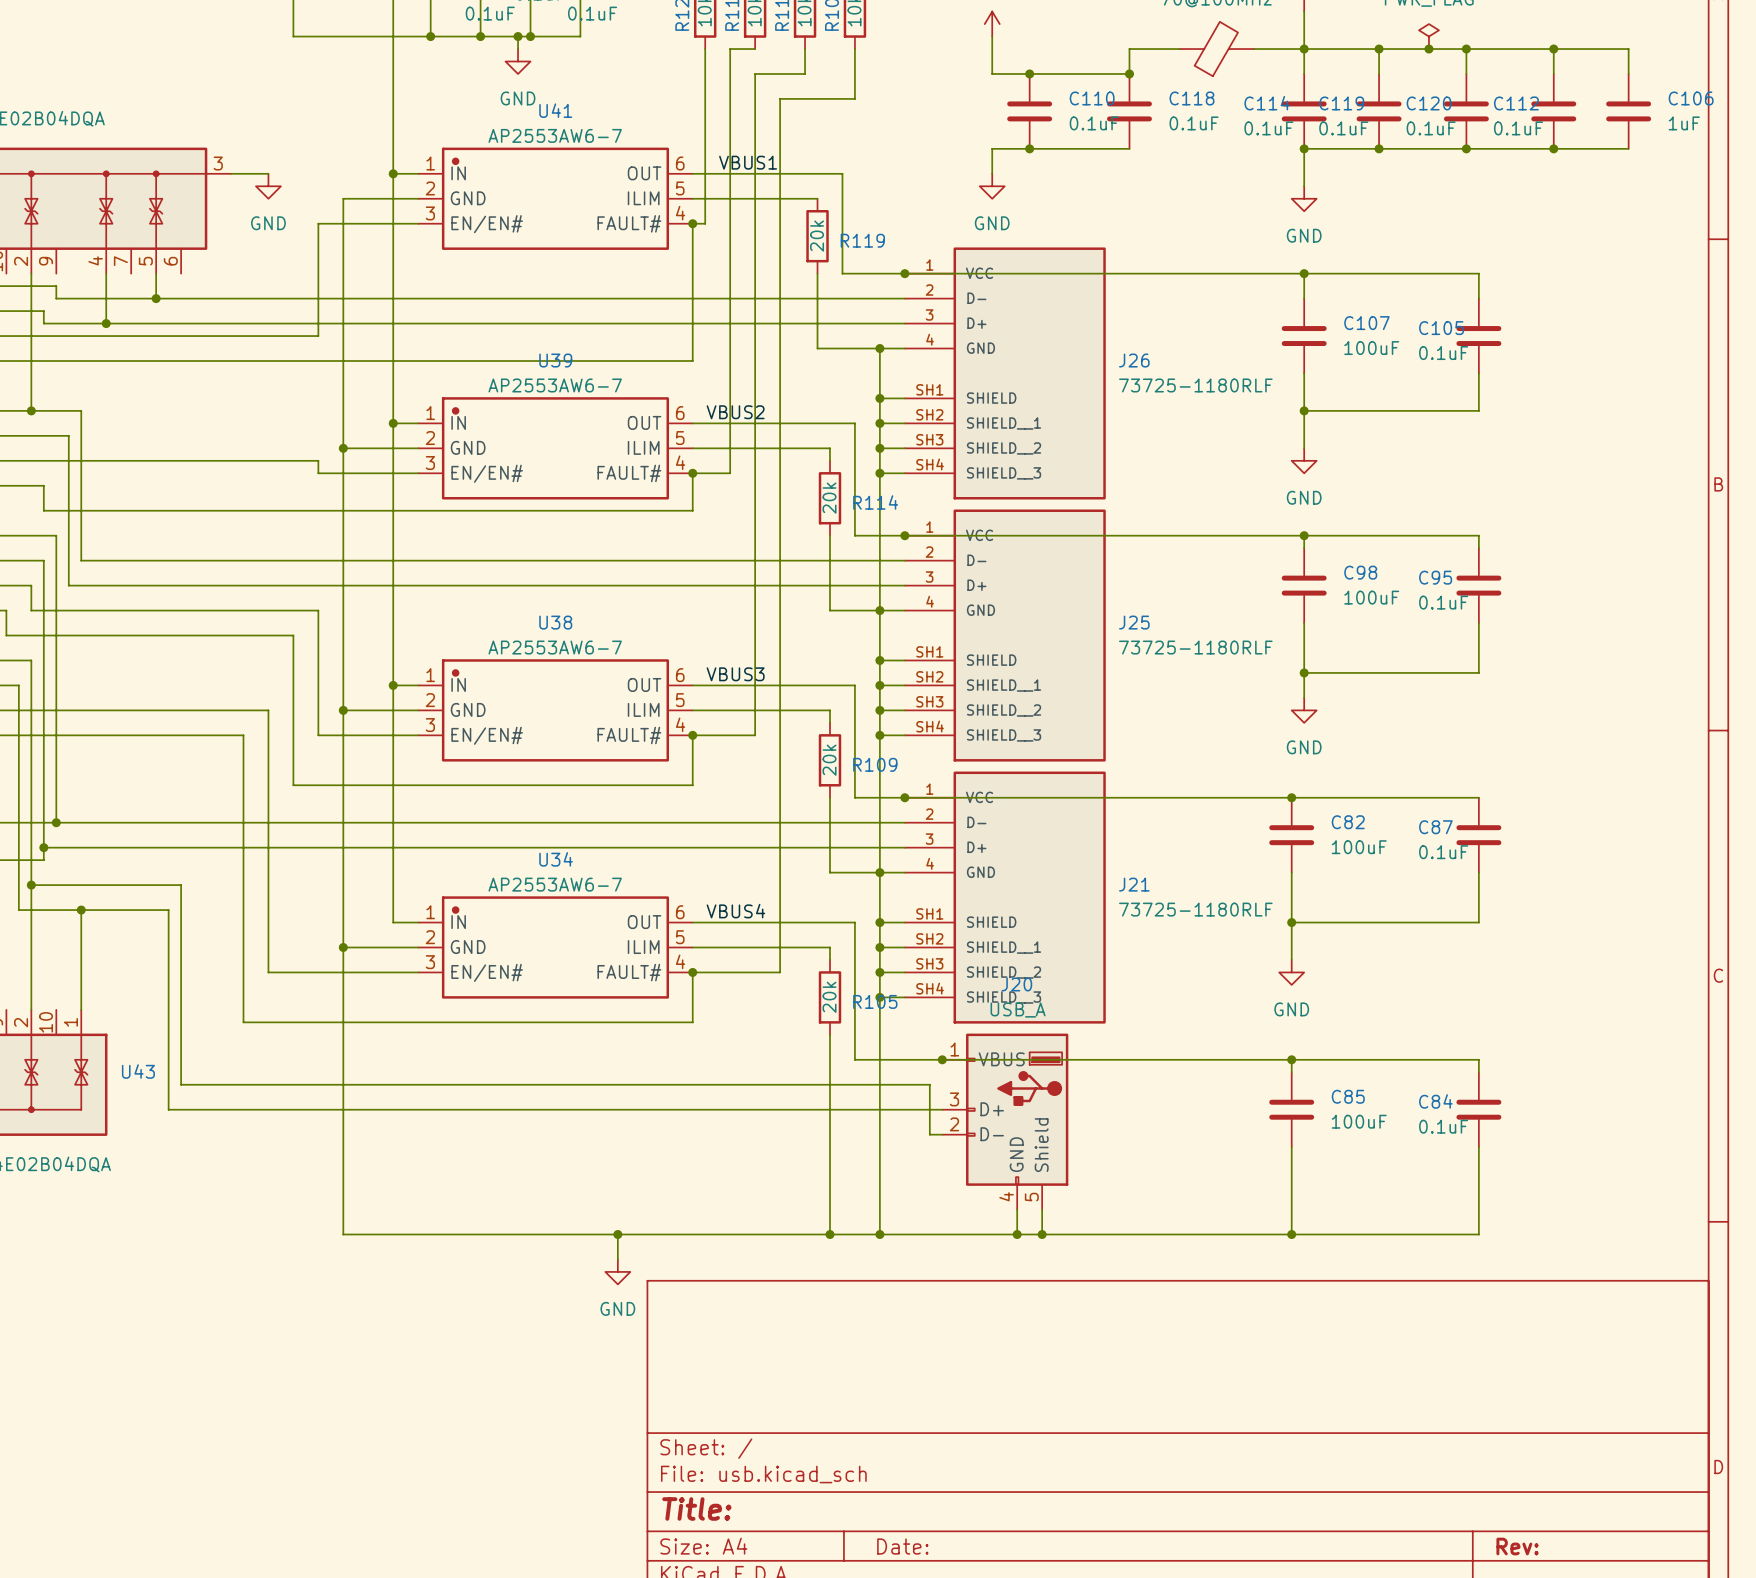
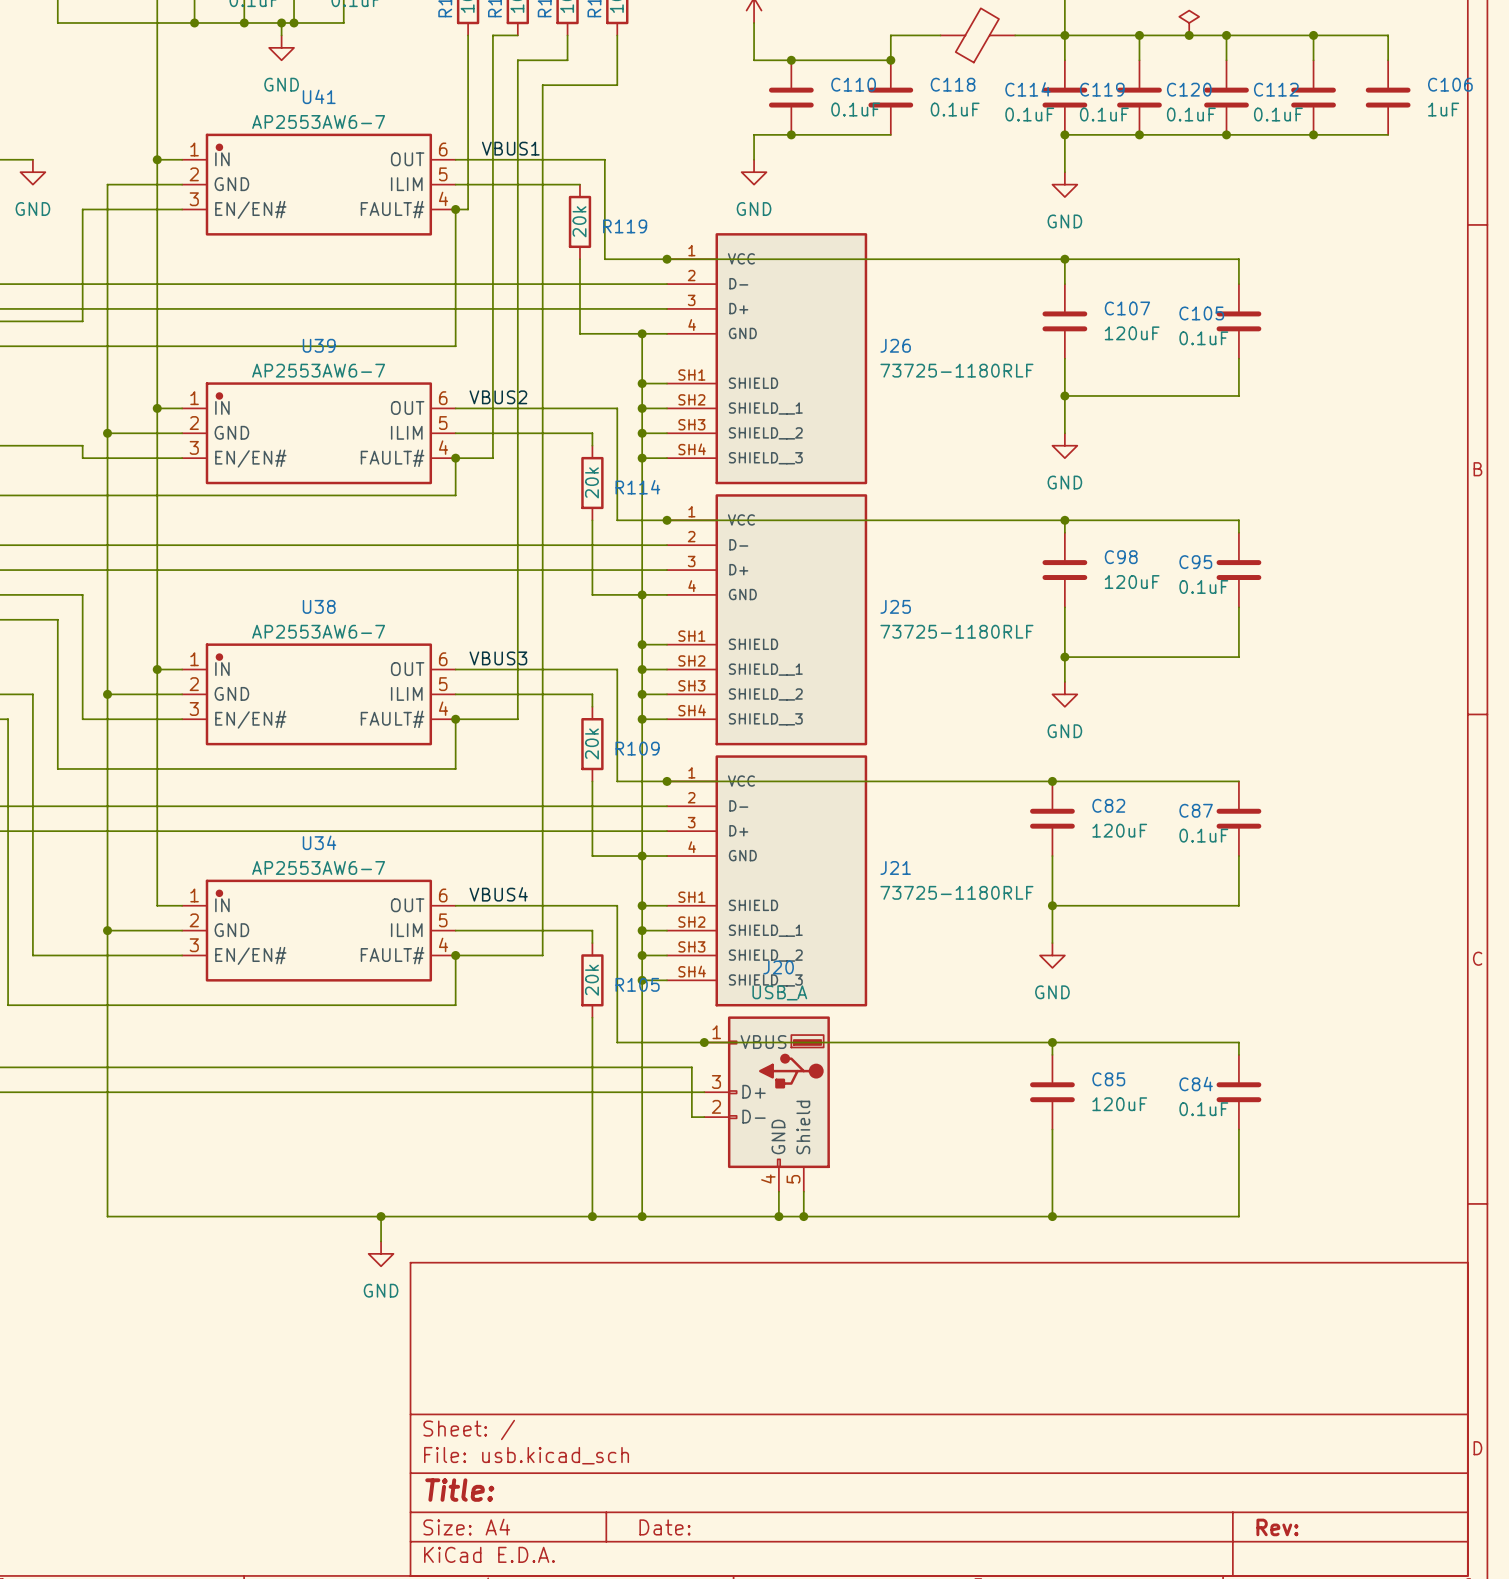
C107 value: 100uF (1371, 348) -> 120uF (1132, 333)
C98 value: 100uF (1371, 597) -> 120uF (1132, 582)
C82 value: 100uF (1359, 847) -> 120uF (1119, 830)
C85 value: 100uF (1359, 1121) -> 120uF (1119, 1104)

